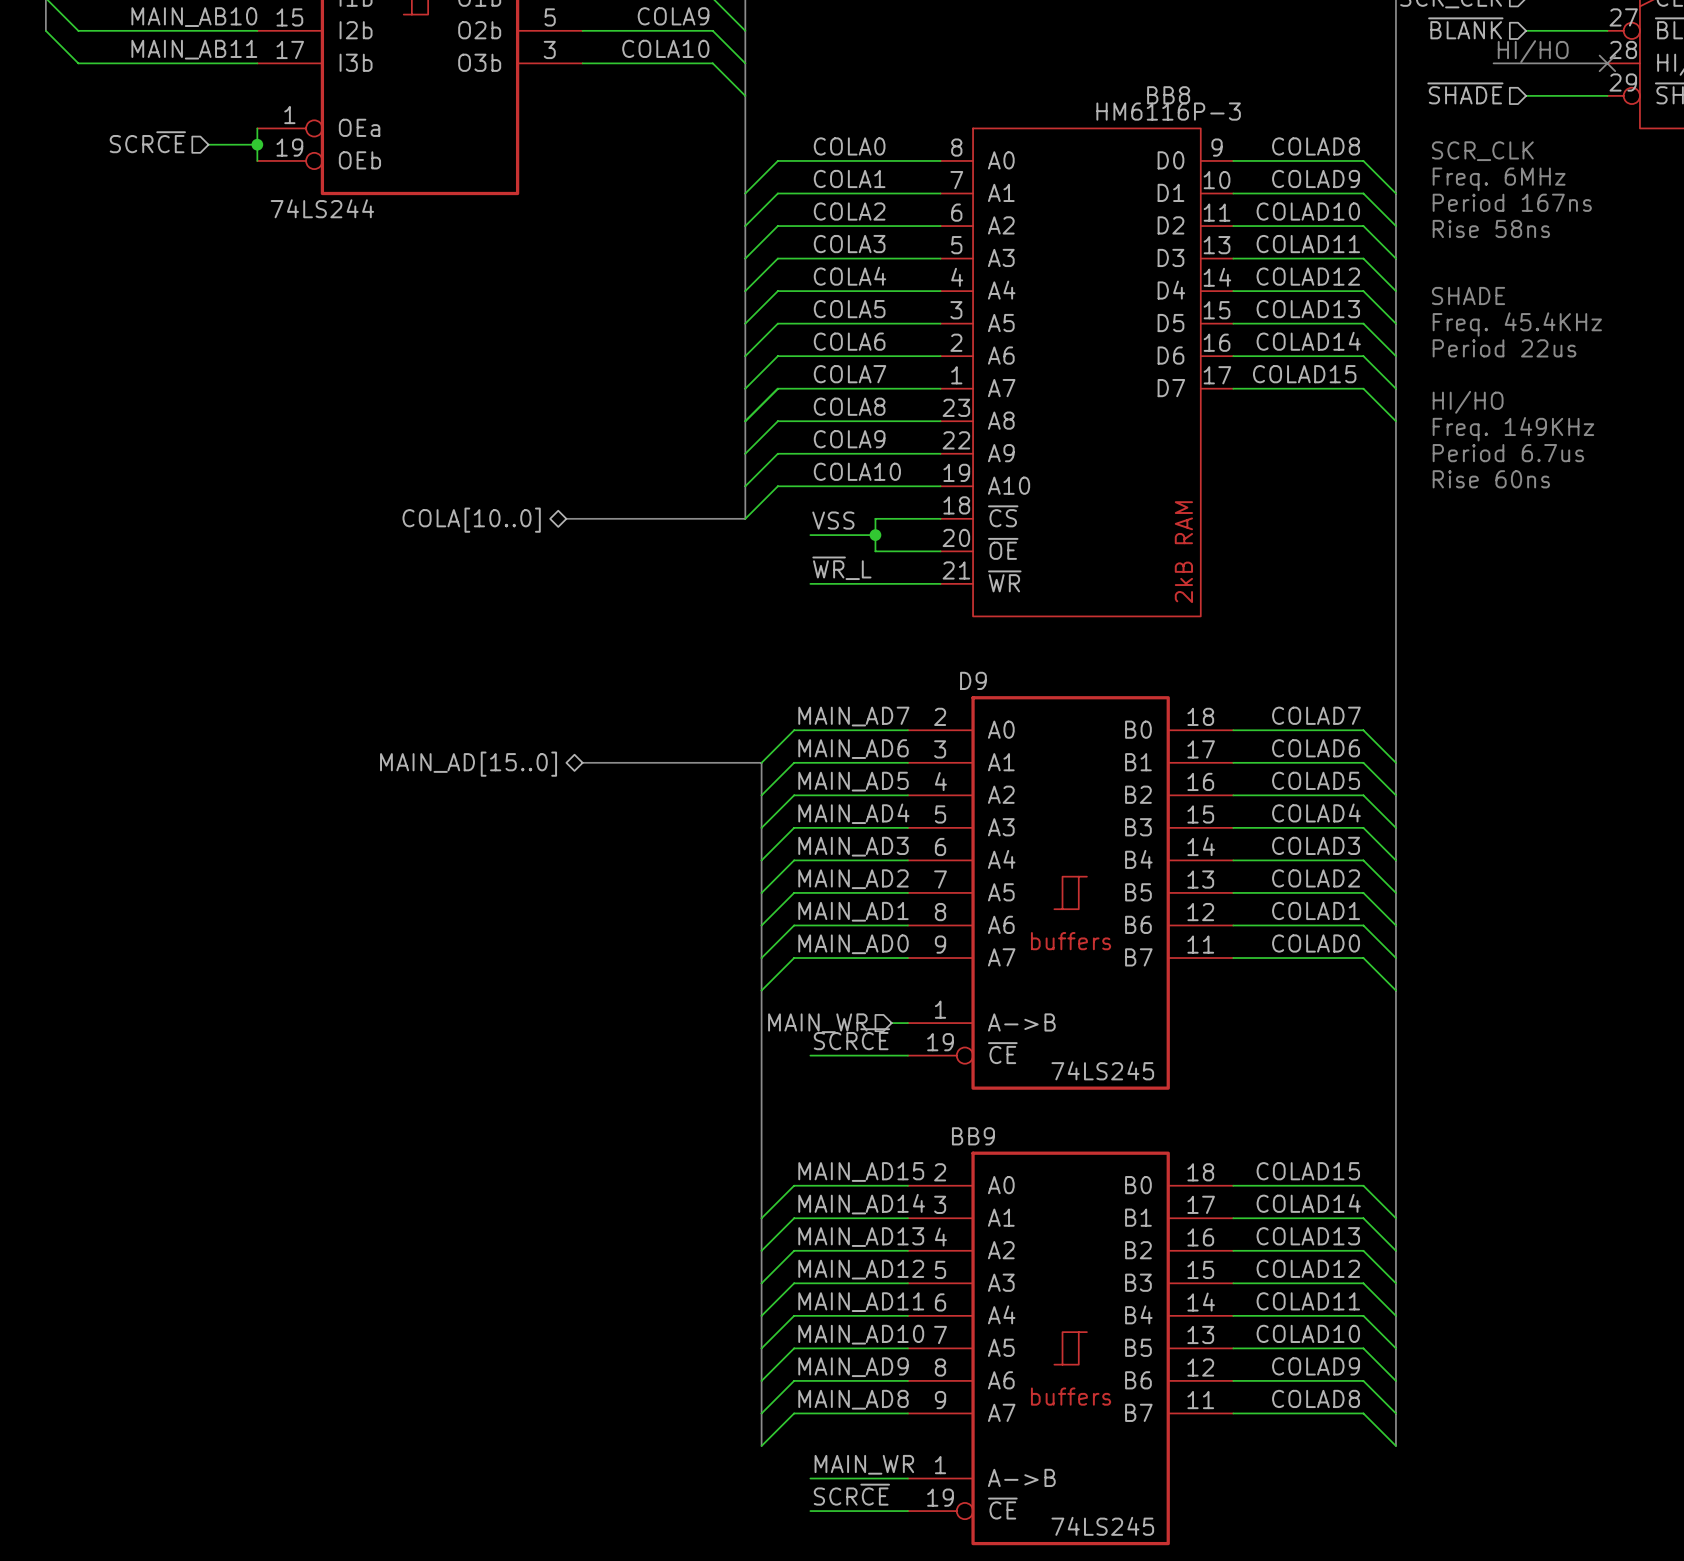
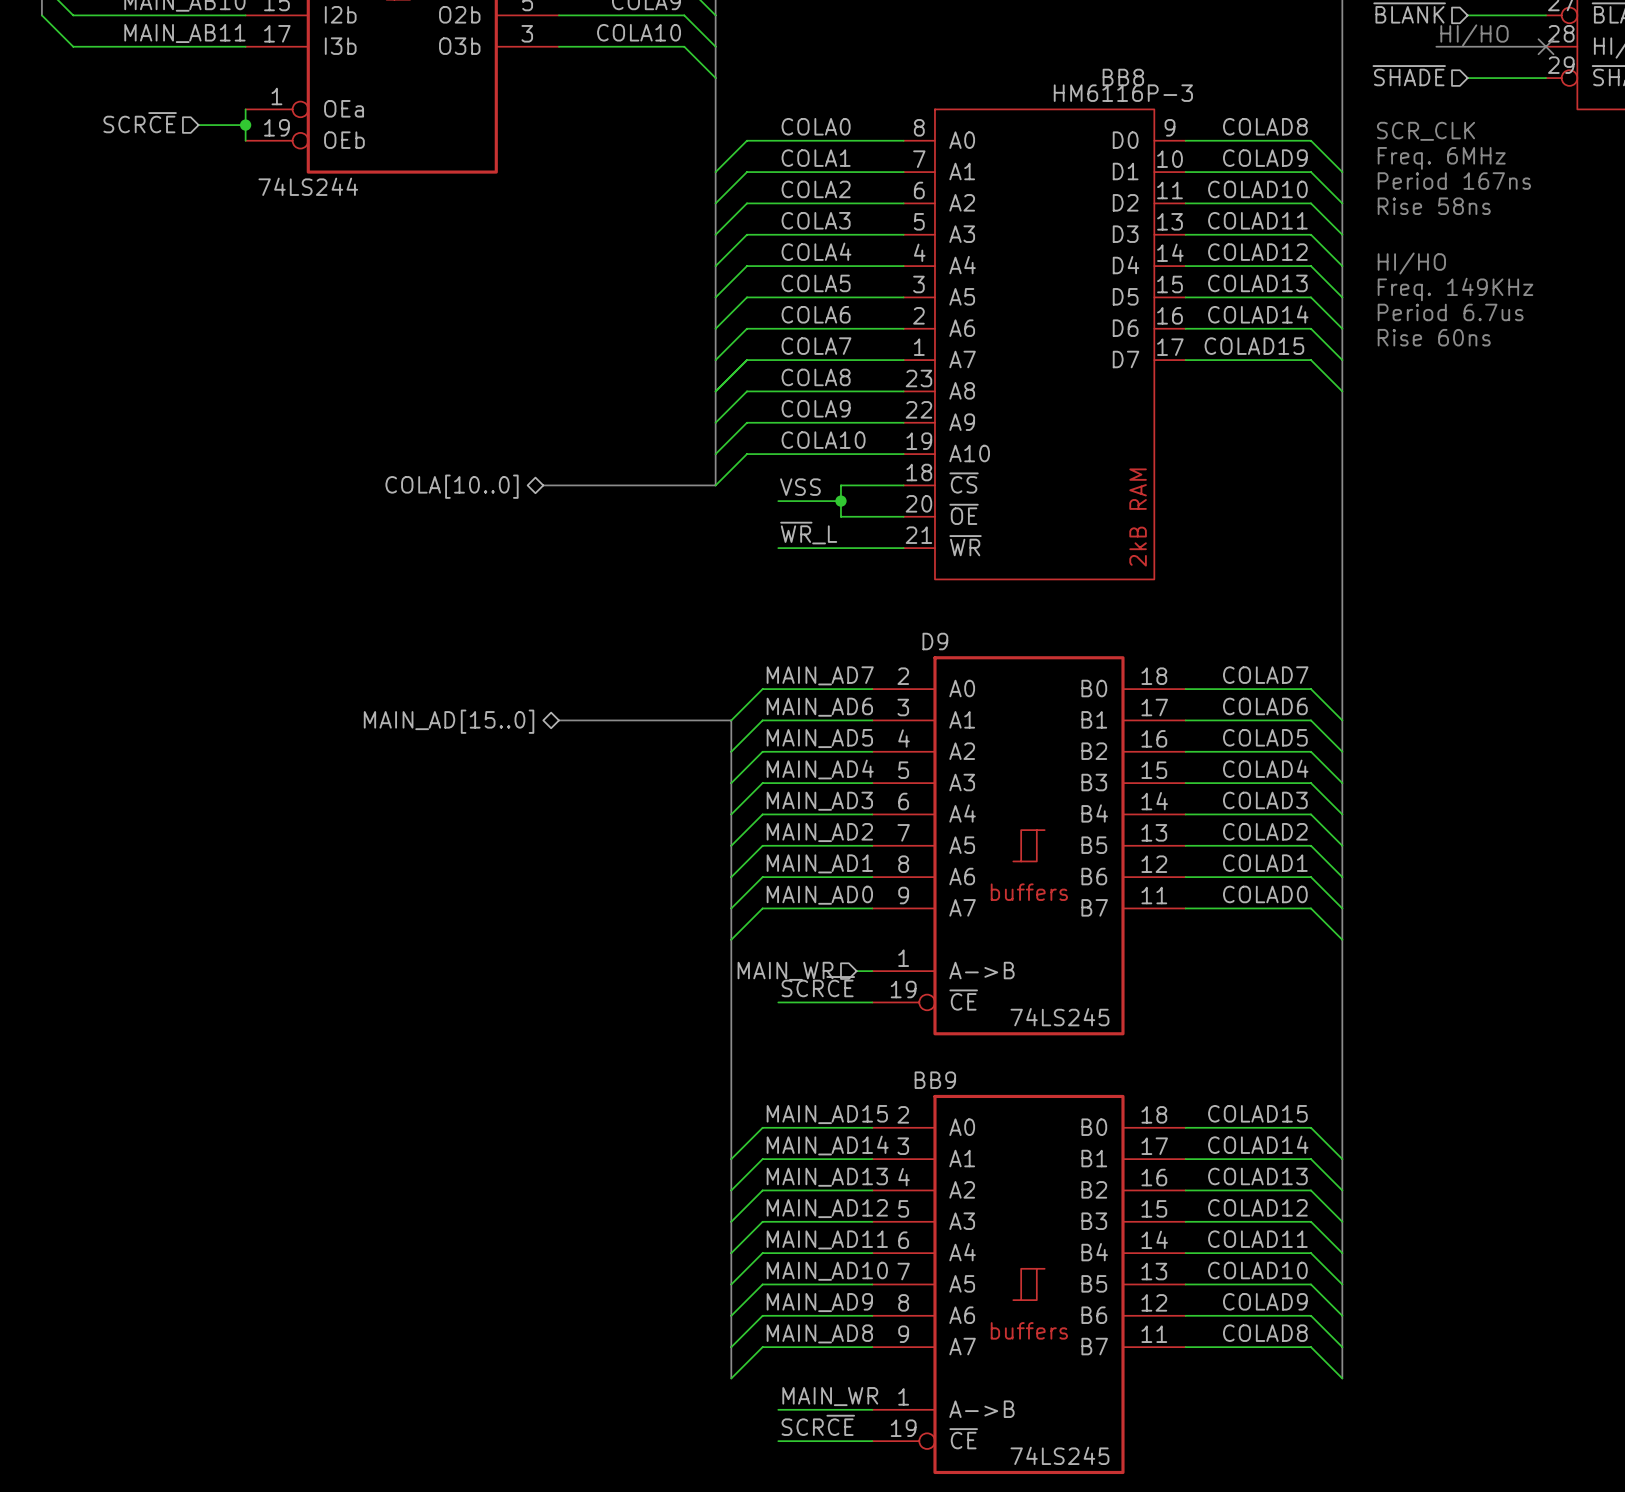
text: SHADE (1468, 295) -> none
text: Freq. 45.4KHz (1517, 324) -> none
text: Period 22us (1504, 348) -> none
text position: HI/HO (1468, 402) -> HI/HO (1411, 263)
text position: Freq. 149KHz (1513, 429) -> Freq. 149KHz (1455, 289)
text position: Period 6.7us (1508, 453) -> Period 6.7us (1450, 312)
text position: Rise 60ns (1491, 479) -> Rise 60ns (1434, 337)

